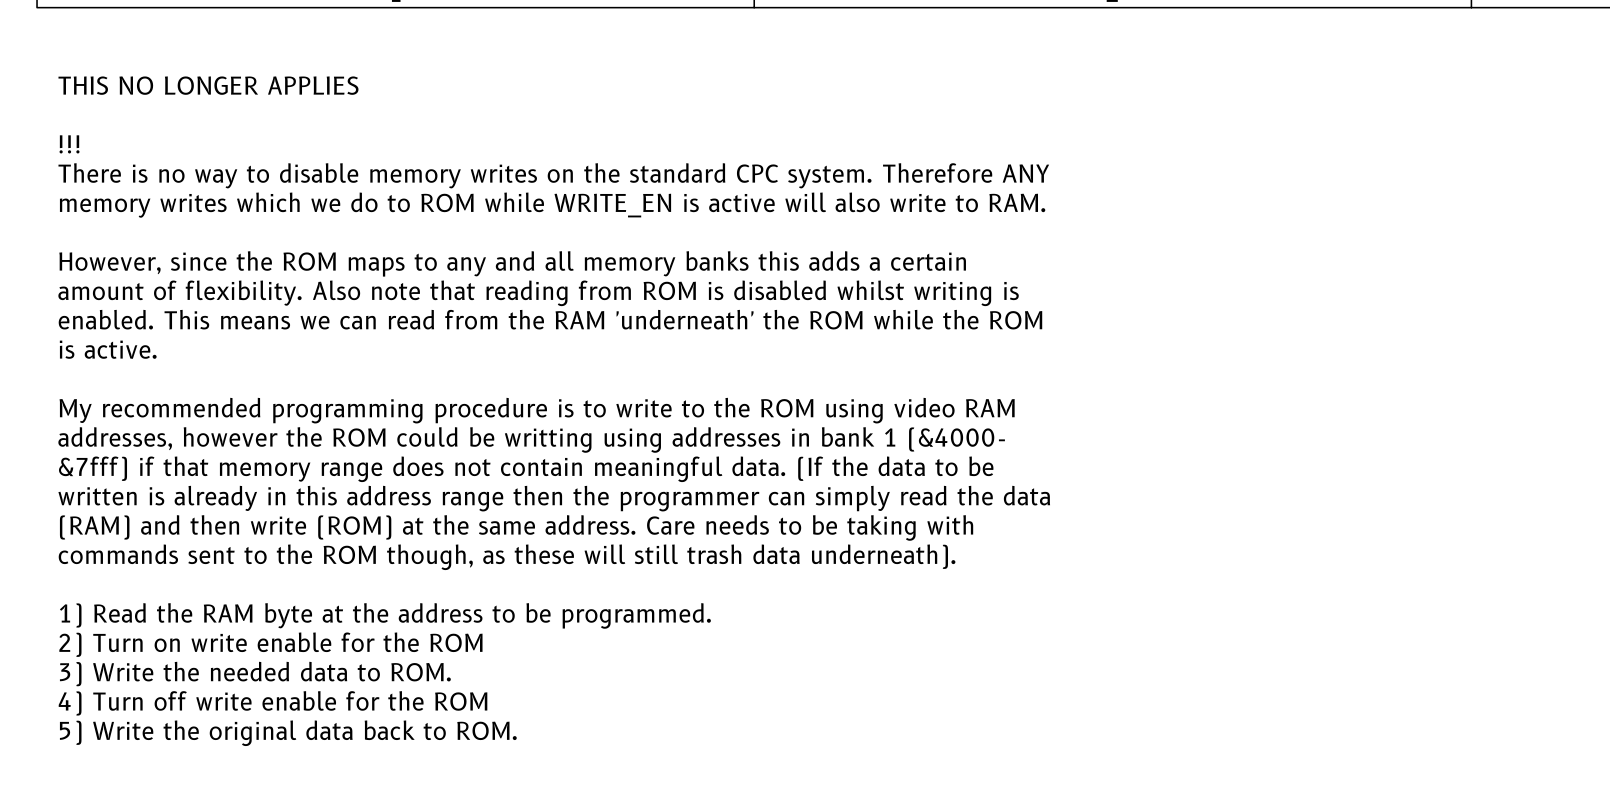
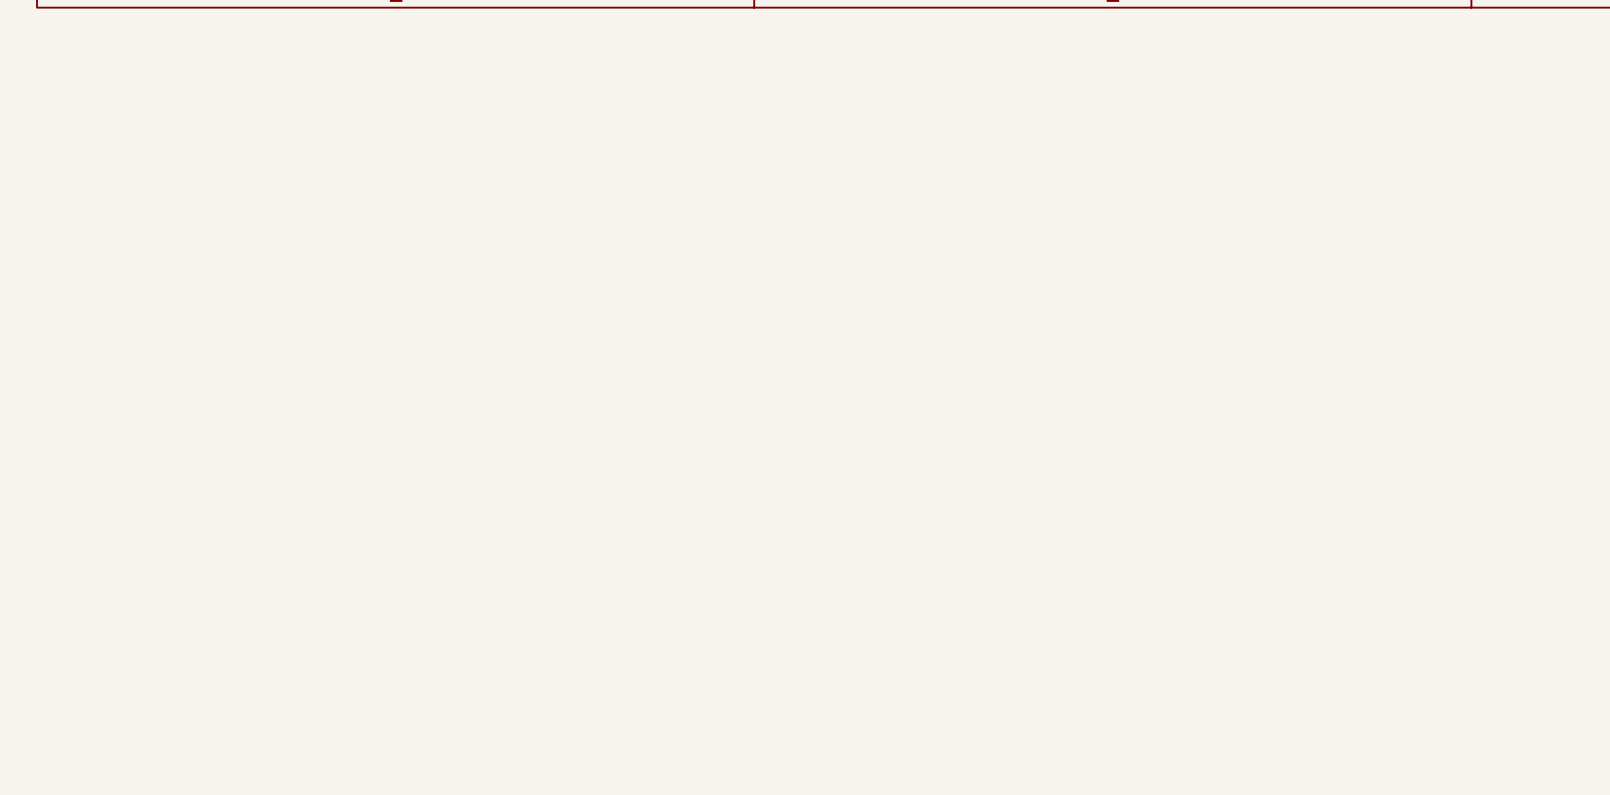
text: THIS NO LONGER APPLIES (208, 85) -> none
text: !!! (69, 144) -> none
text: There is no way to disable memory writes on the standard CPC system. Therefore ANY (553, 175) -> none
text: memory writes which we do to ROM while WRITE_EN is active will also write to RAM. (552, 205) -> none
text: However, since the ROM maps to any and all memory banks this adds a certain (512, 263) -> none
text: amount of flexibility. Also note that reading from ROM is disabled whilst writing is (538, 293) -> none
text: enabled. This means we can read from the RAM 'underneath' the ROM while the ROM (550, 319) -> none
text: is active. (108, 349) -> none
text: My recommended programming procedure is to write to the ROM using video RAM (537, 410) -> none
text: addresses, however the ROM could be writting using addresses in bank 1 (&4000- (531, 439) -> none
text: &7fff) if that memory range does not contain meaningful data. (If the data to be (526, 469) -> none
text: written is already in this address range then the programmer can simply read the data (554, 498) -> none
text: (RAM) and then write (ROM) at the same address. Care needs to be taking with (516, 527) -> none
text: commands sent to the ROM though, as these will still trash data underneath). (507, 557) -> none
text: 1) Read the RAM byte at the address to be programmed. (385, 615) -> none
text: 2) Turn on write enable for the ROM (270, 644) -> none
text: 3) Write the needed data to ROM. (255, 674) -> none
text: 4) Turn off write enable for the ROM (273, 703) -> none
text: 5) Write the original data back to ROM. (288, 733) -> none

